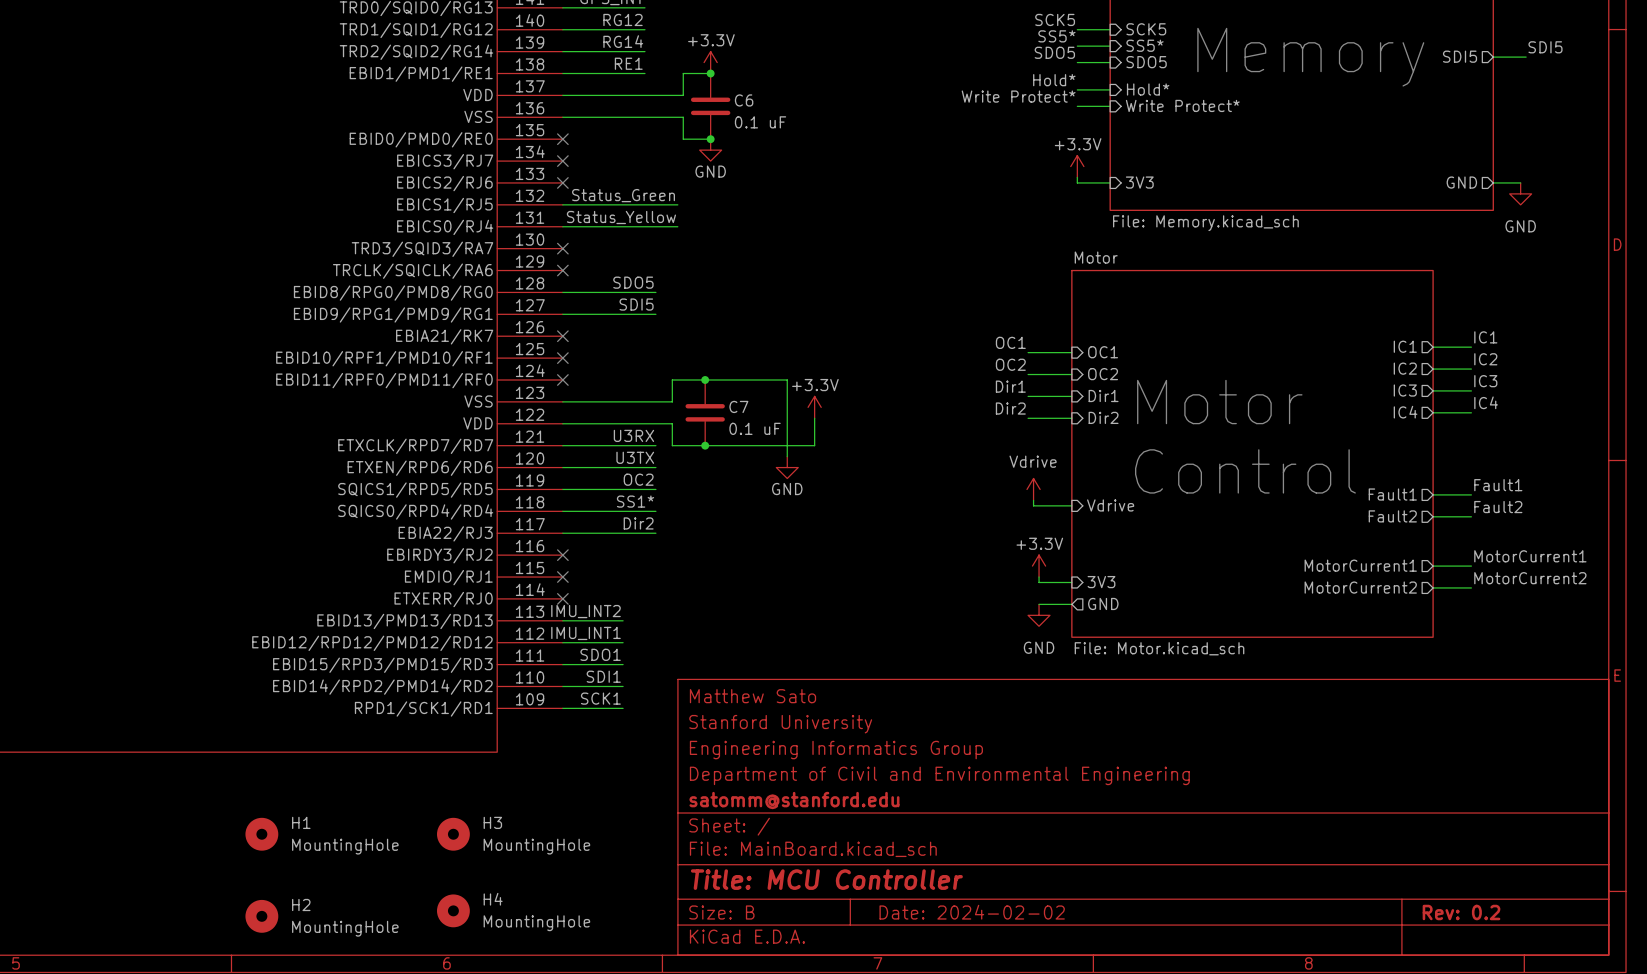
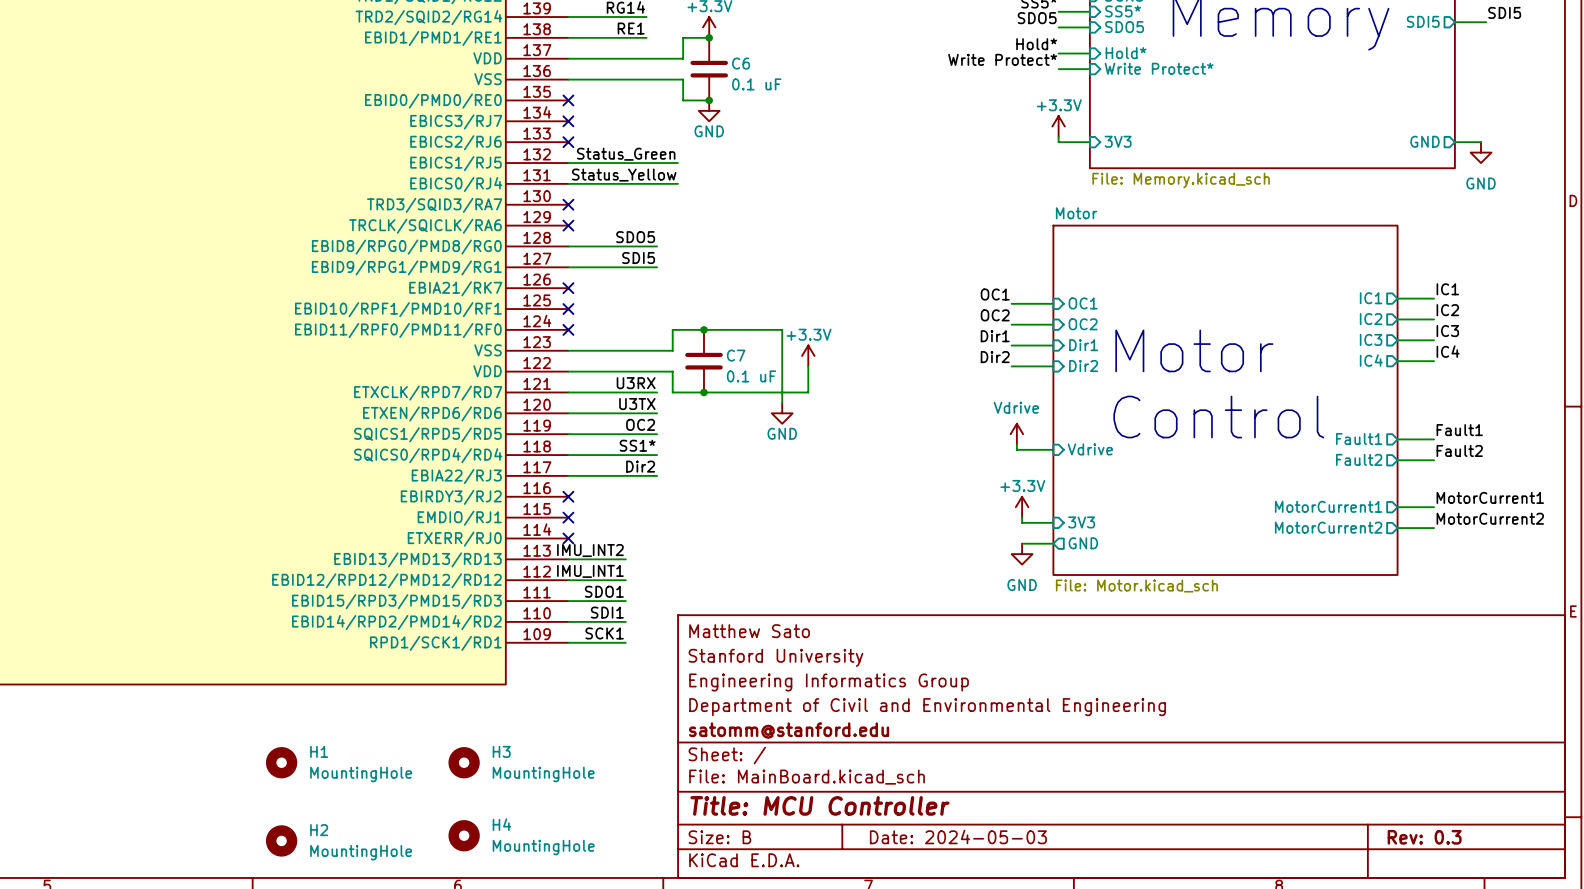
title block: Date: 2024-02-02 (972, 912) -> Date: 2024-05-03 (958, 836)
title block: Rev: 0.2 (1461, 912) -> Rev: 0.3 (1424, 837)

